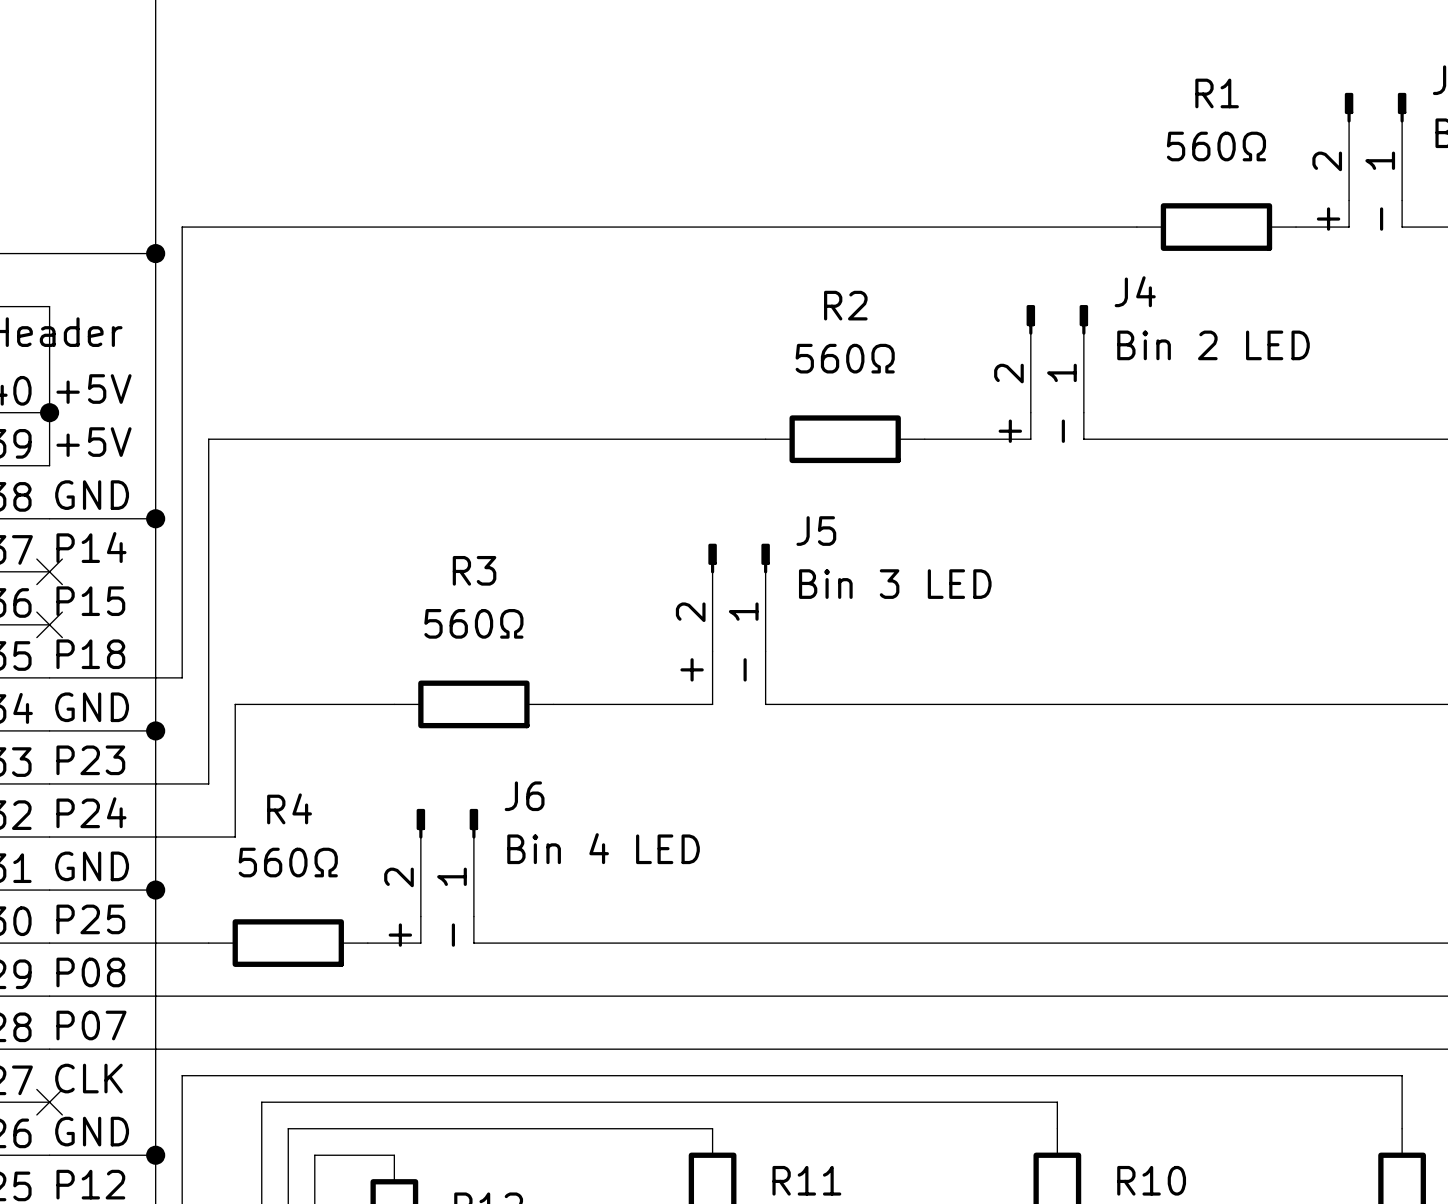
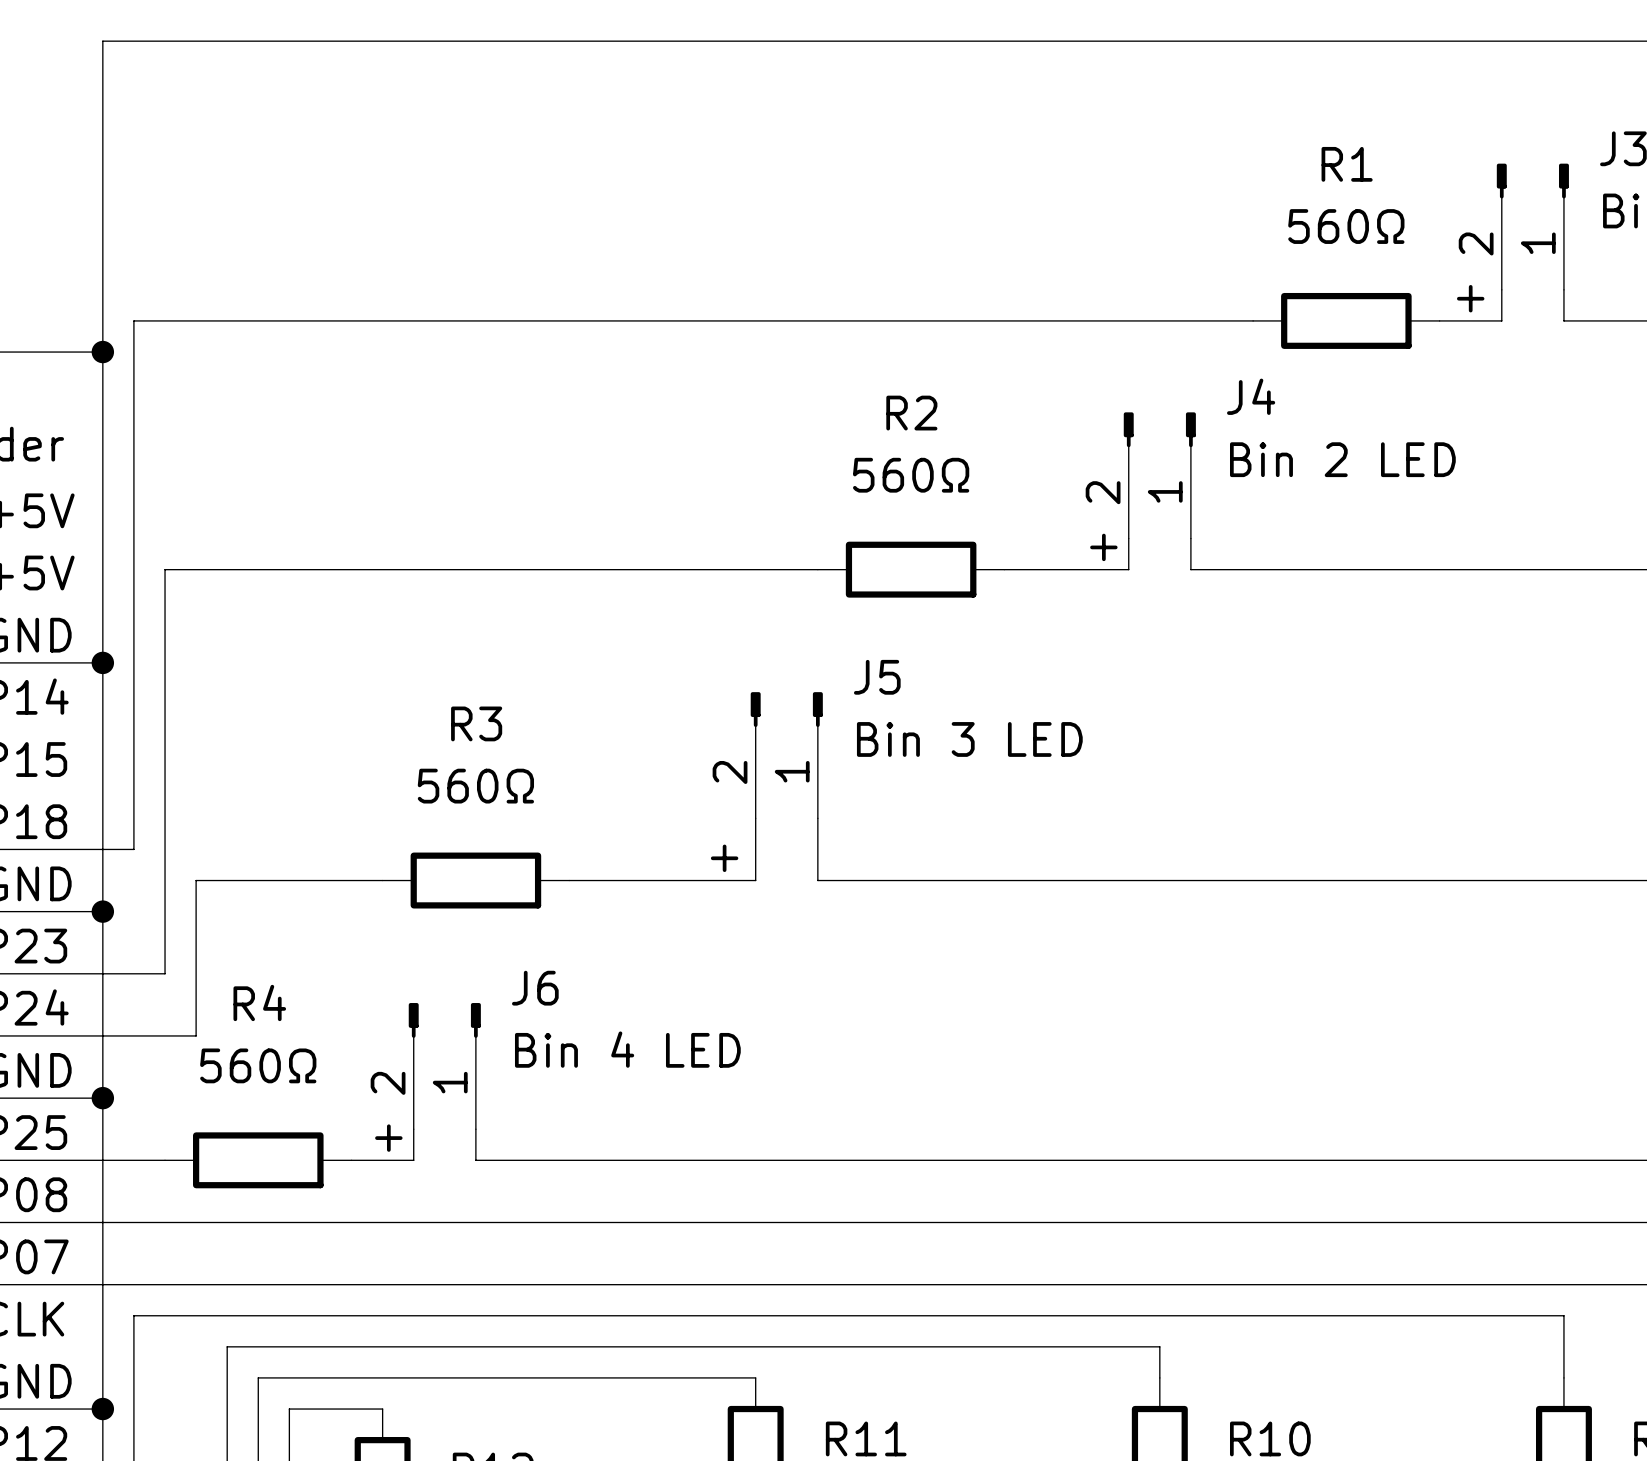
text: none -> + (1470, 298)
label: + (1328, 219) -> none
label: - (1381, 219) -> none
text: none -> + (1103, 547)
label: + (1010, 431) -> none
label: - (1063, 431) -> none
label: + (692, 669) -> none
label: - (745, 669) -> none
text: none -> + (724, 858)
text: none -> + (388, 1138)
label: + (400, 935) -> none
label: - (453, 935) -> none

